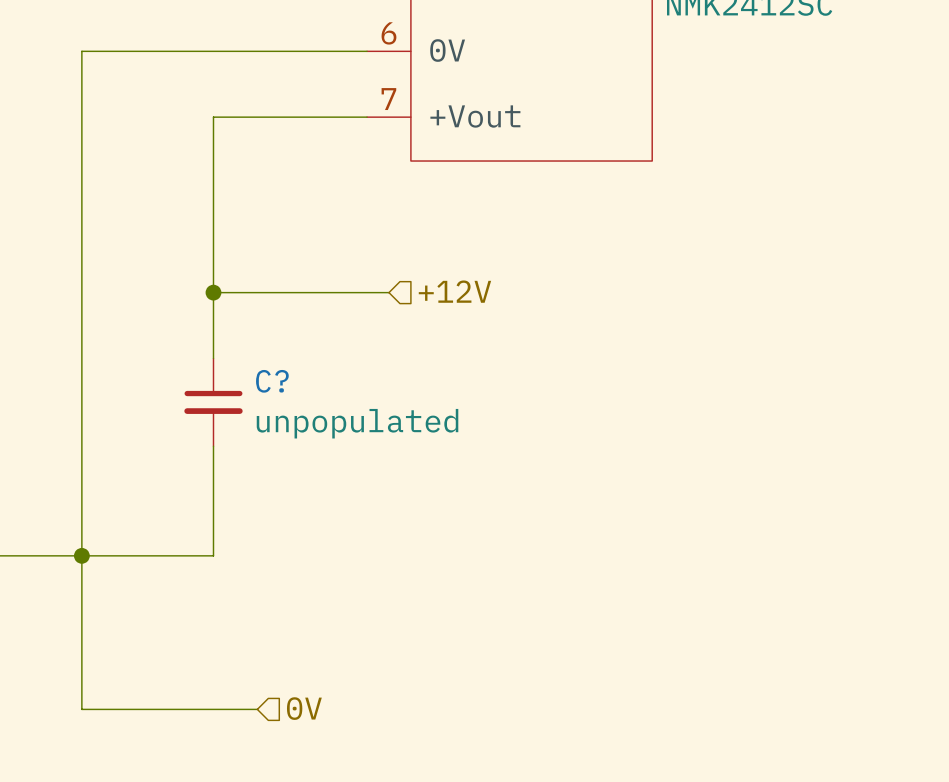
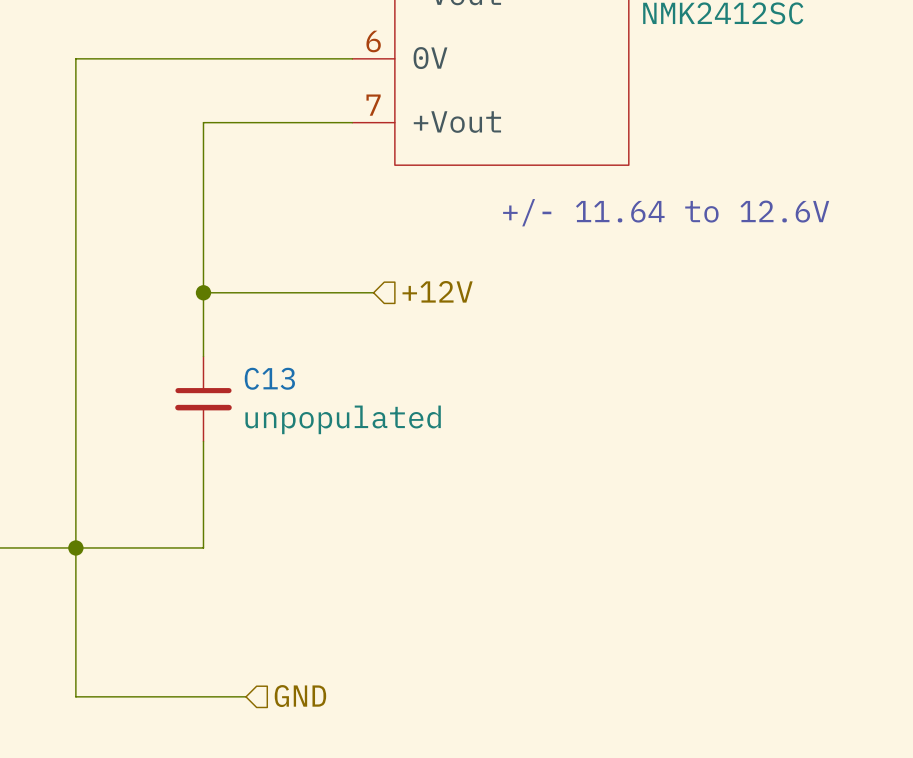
text: none -> +/- 11.64 to 12.6V (666, 212)
C? name: C? (272, 381) -> C13 (269, 378)
hierarchical label: 0V (304, 708) -> GND (300, 696)

